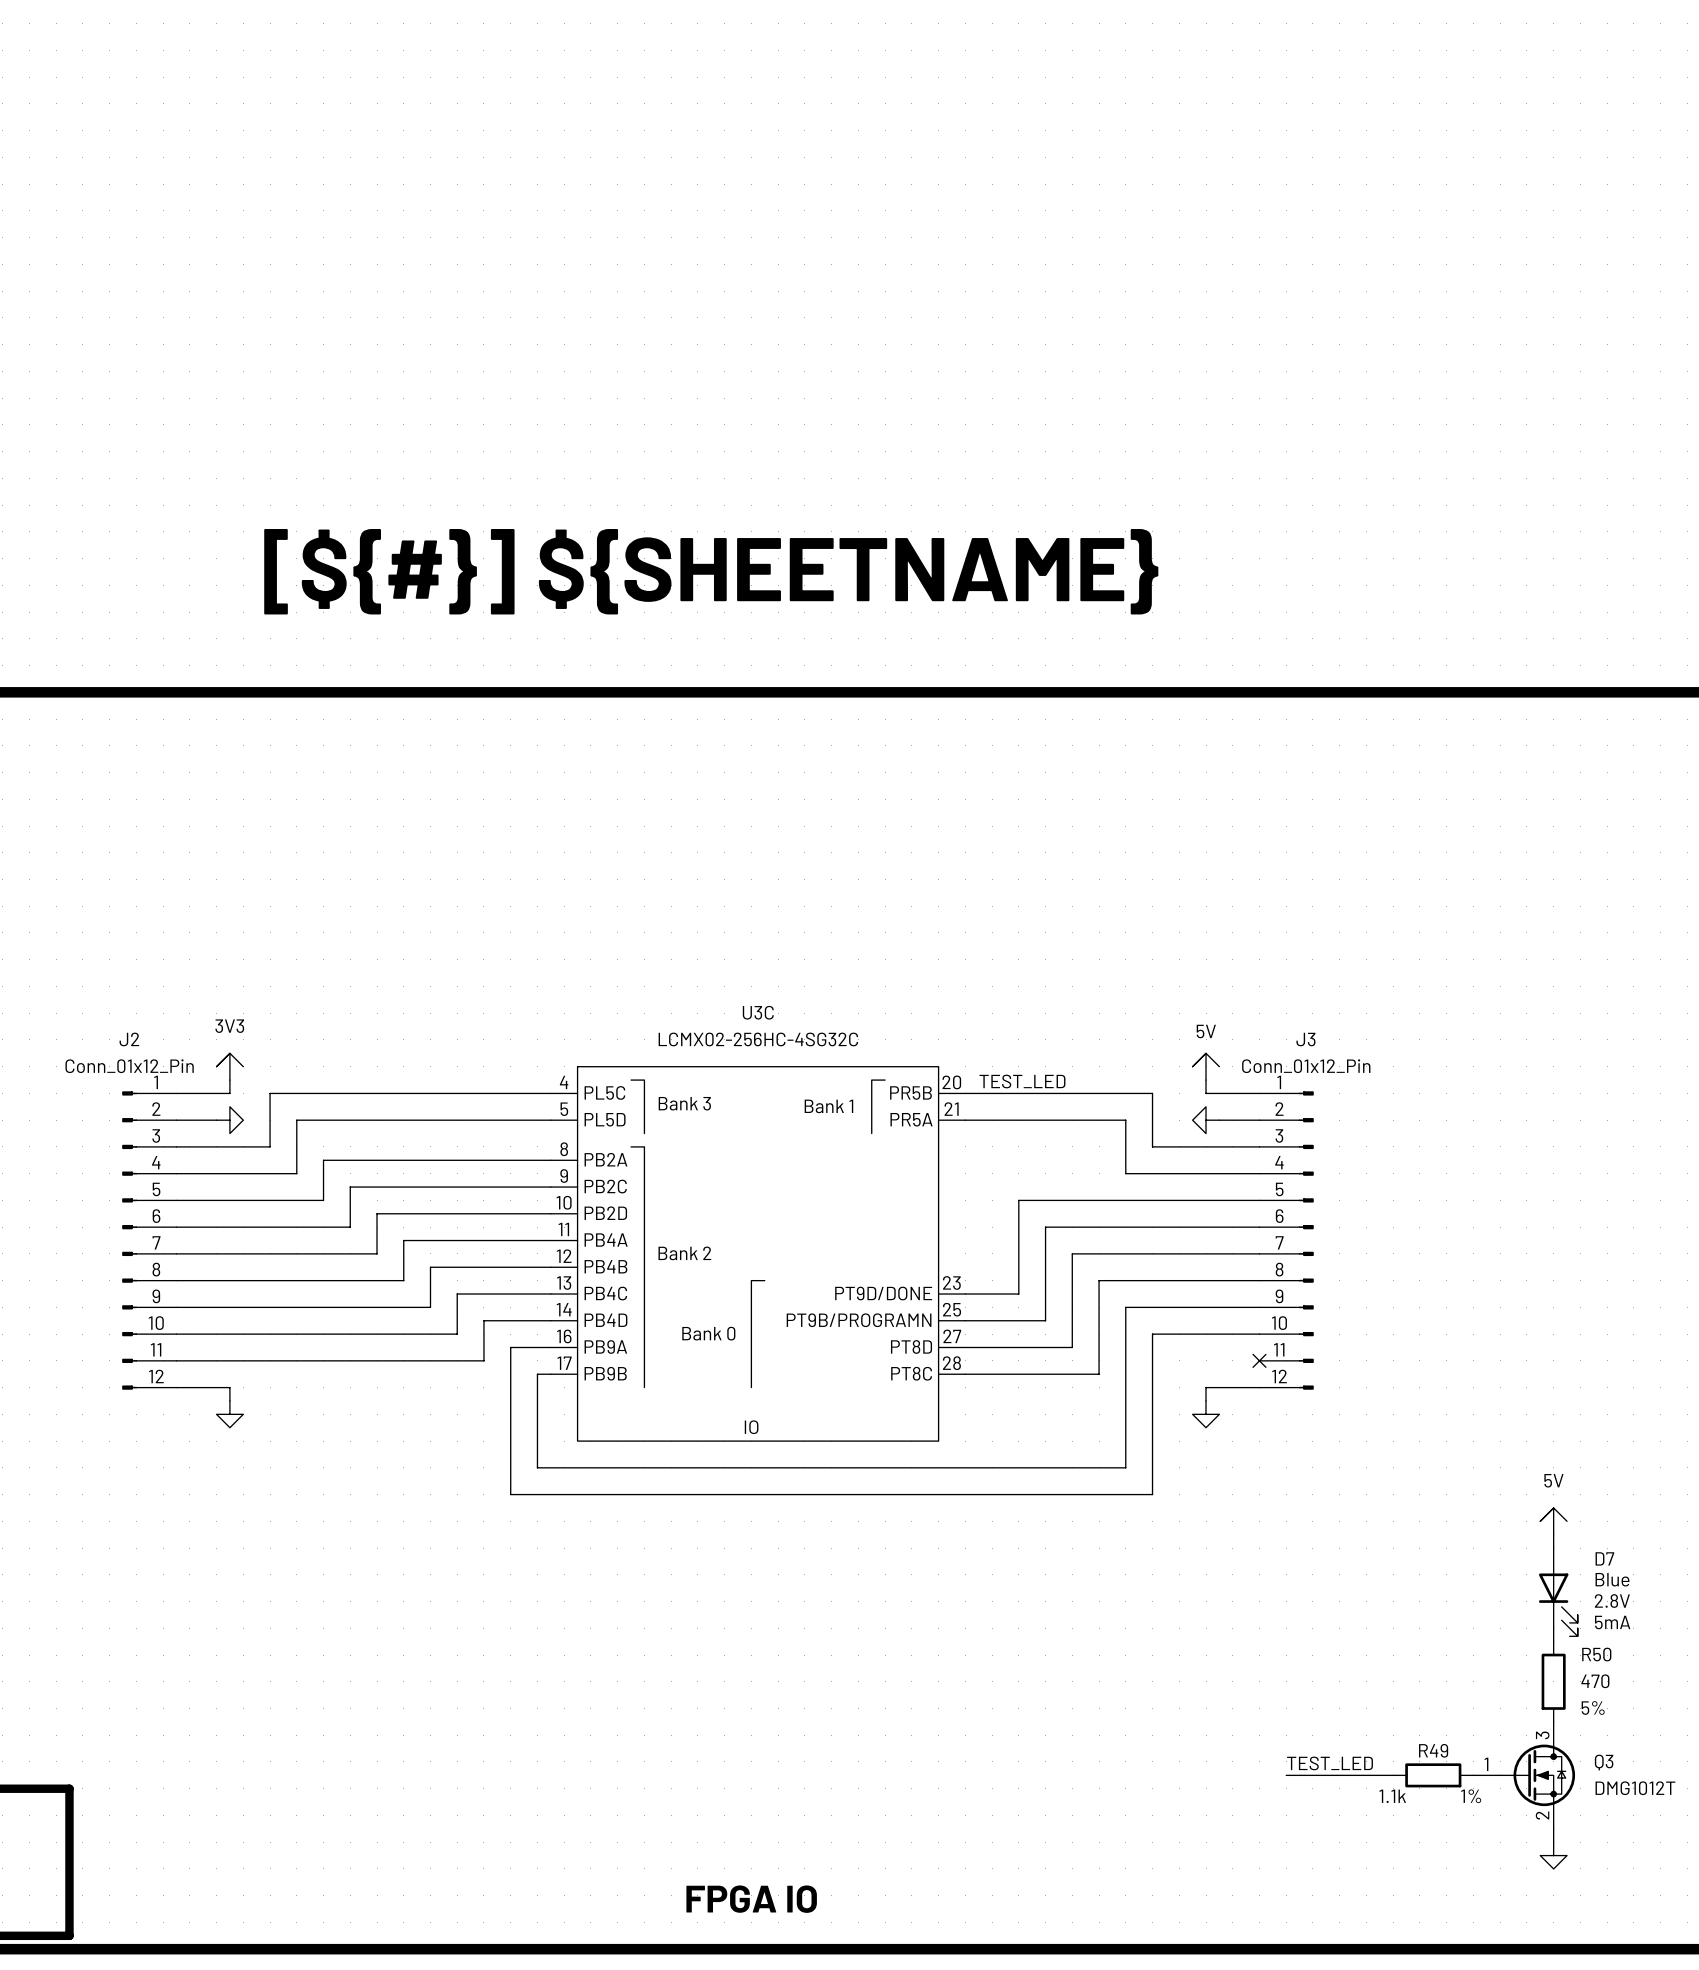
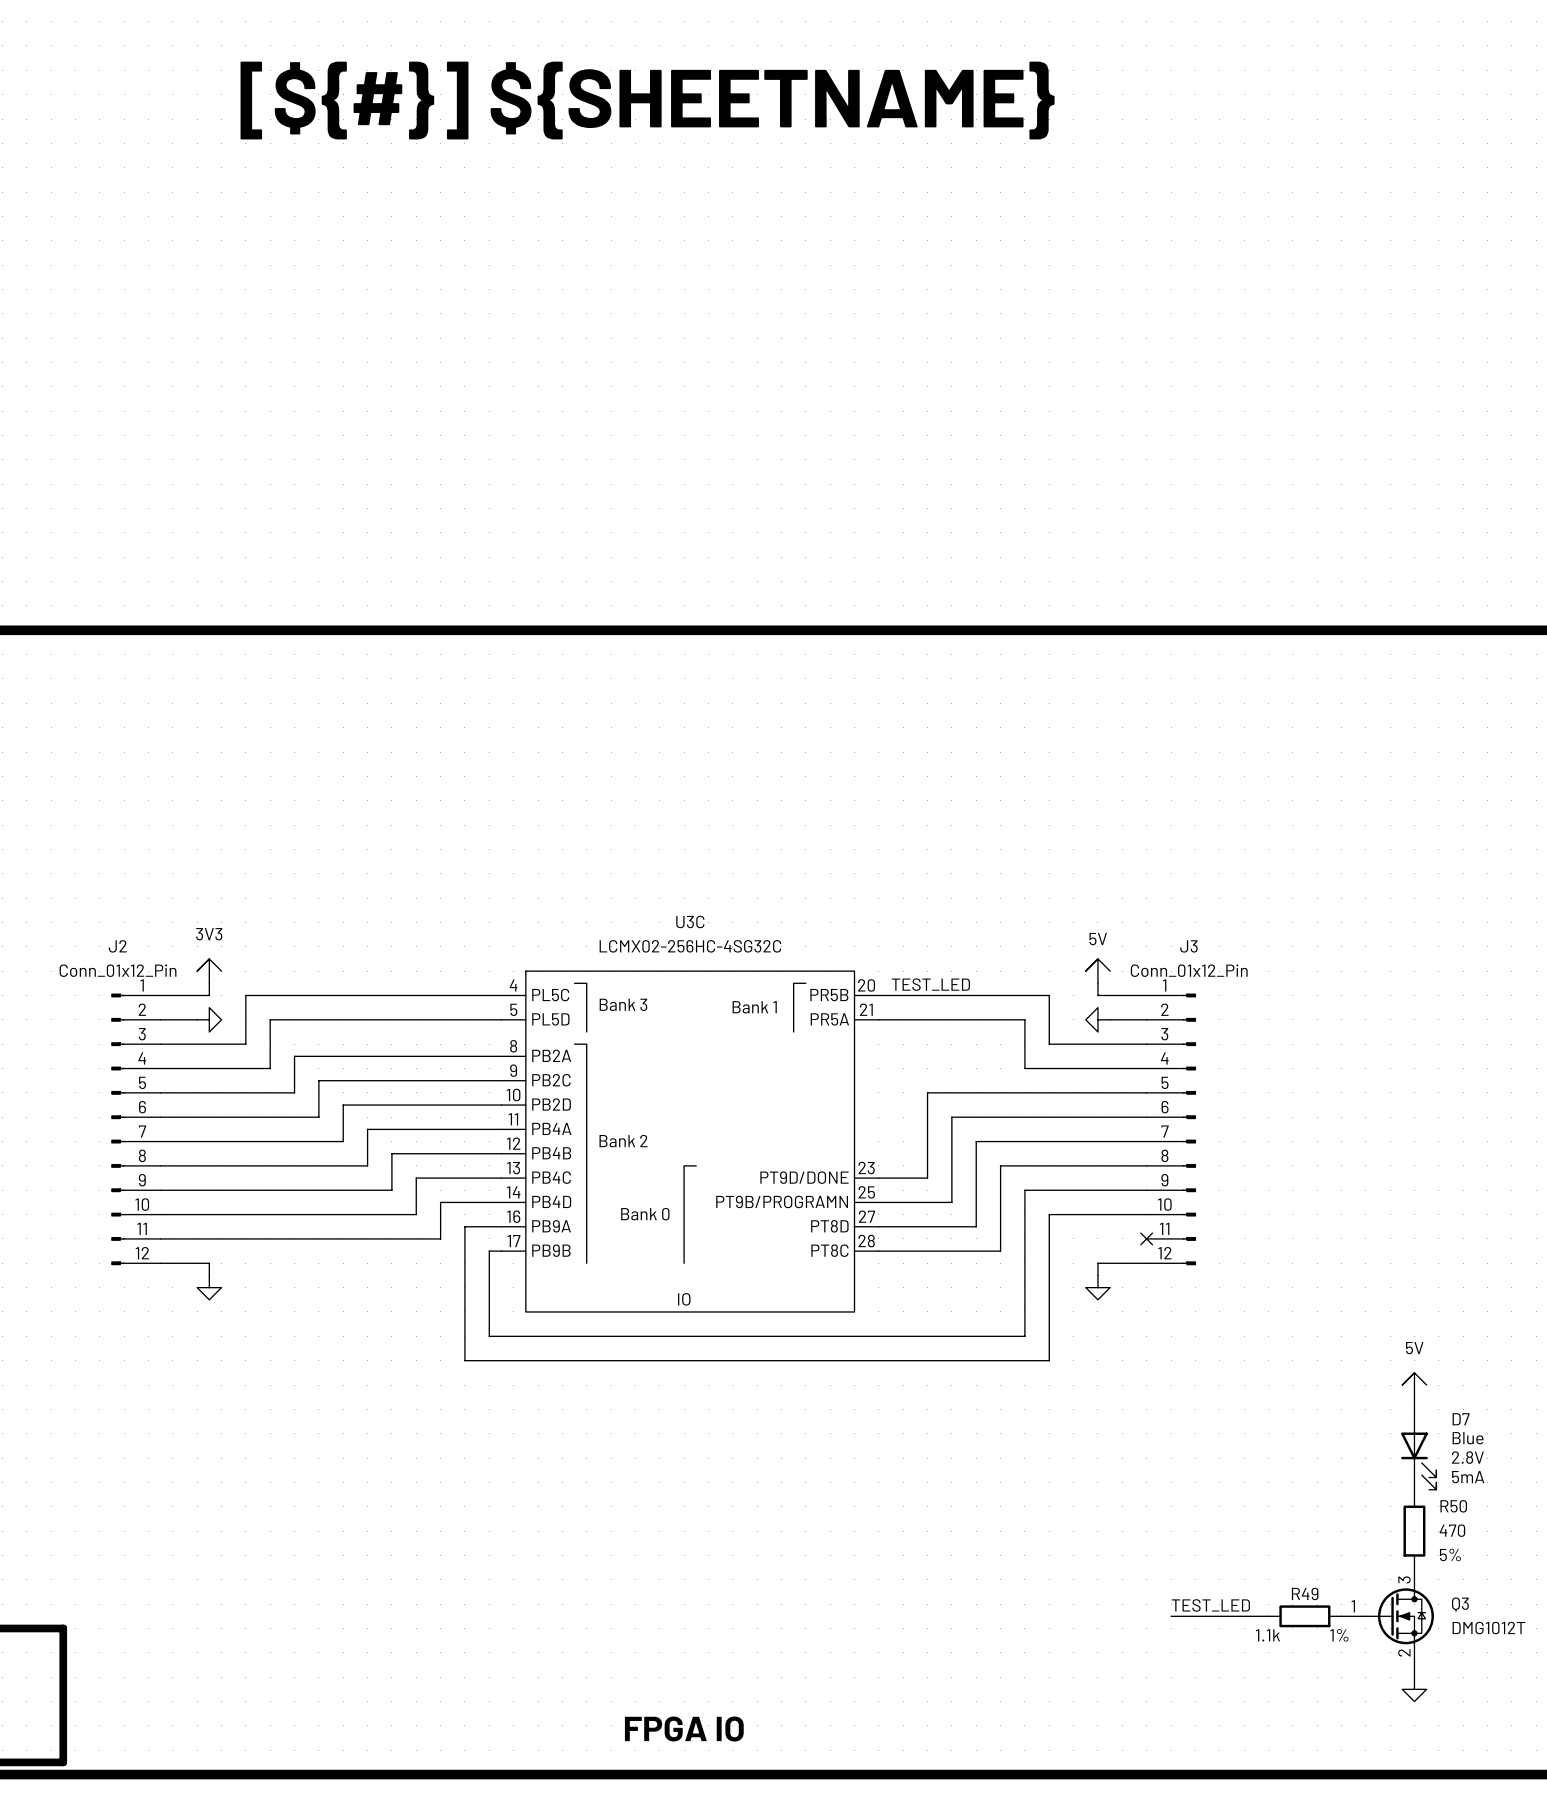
text: none -> [${#}] ${SHEETNAME} (647, 100)
text: [${#}] ${SHEETNAME} (711, 571) -> none

